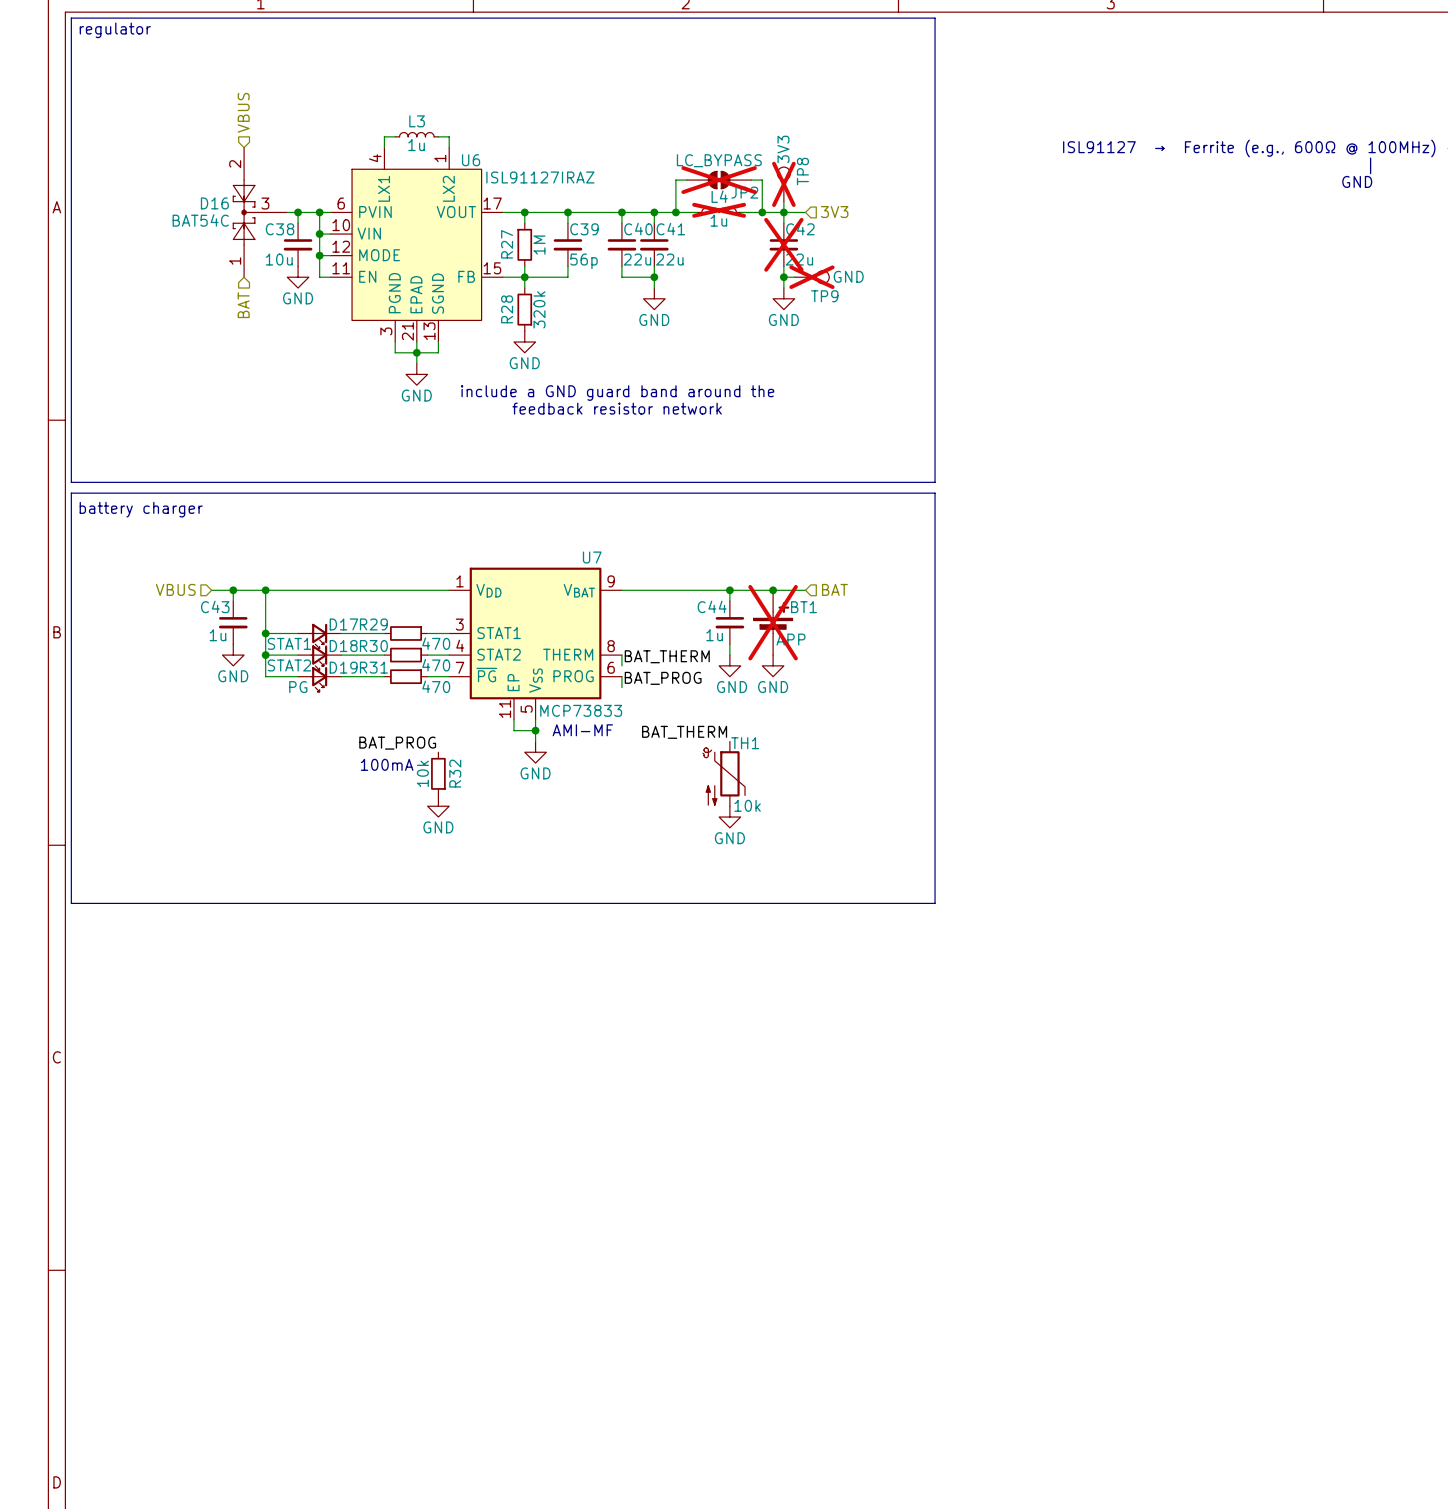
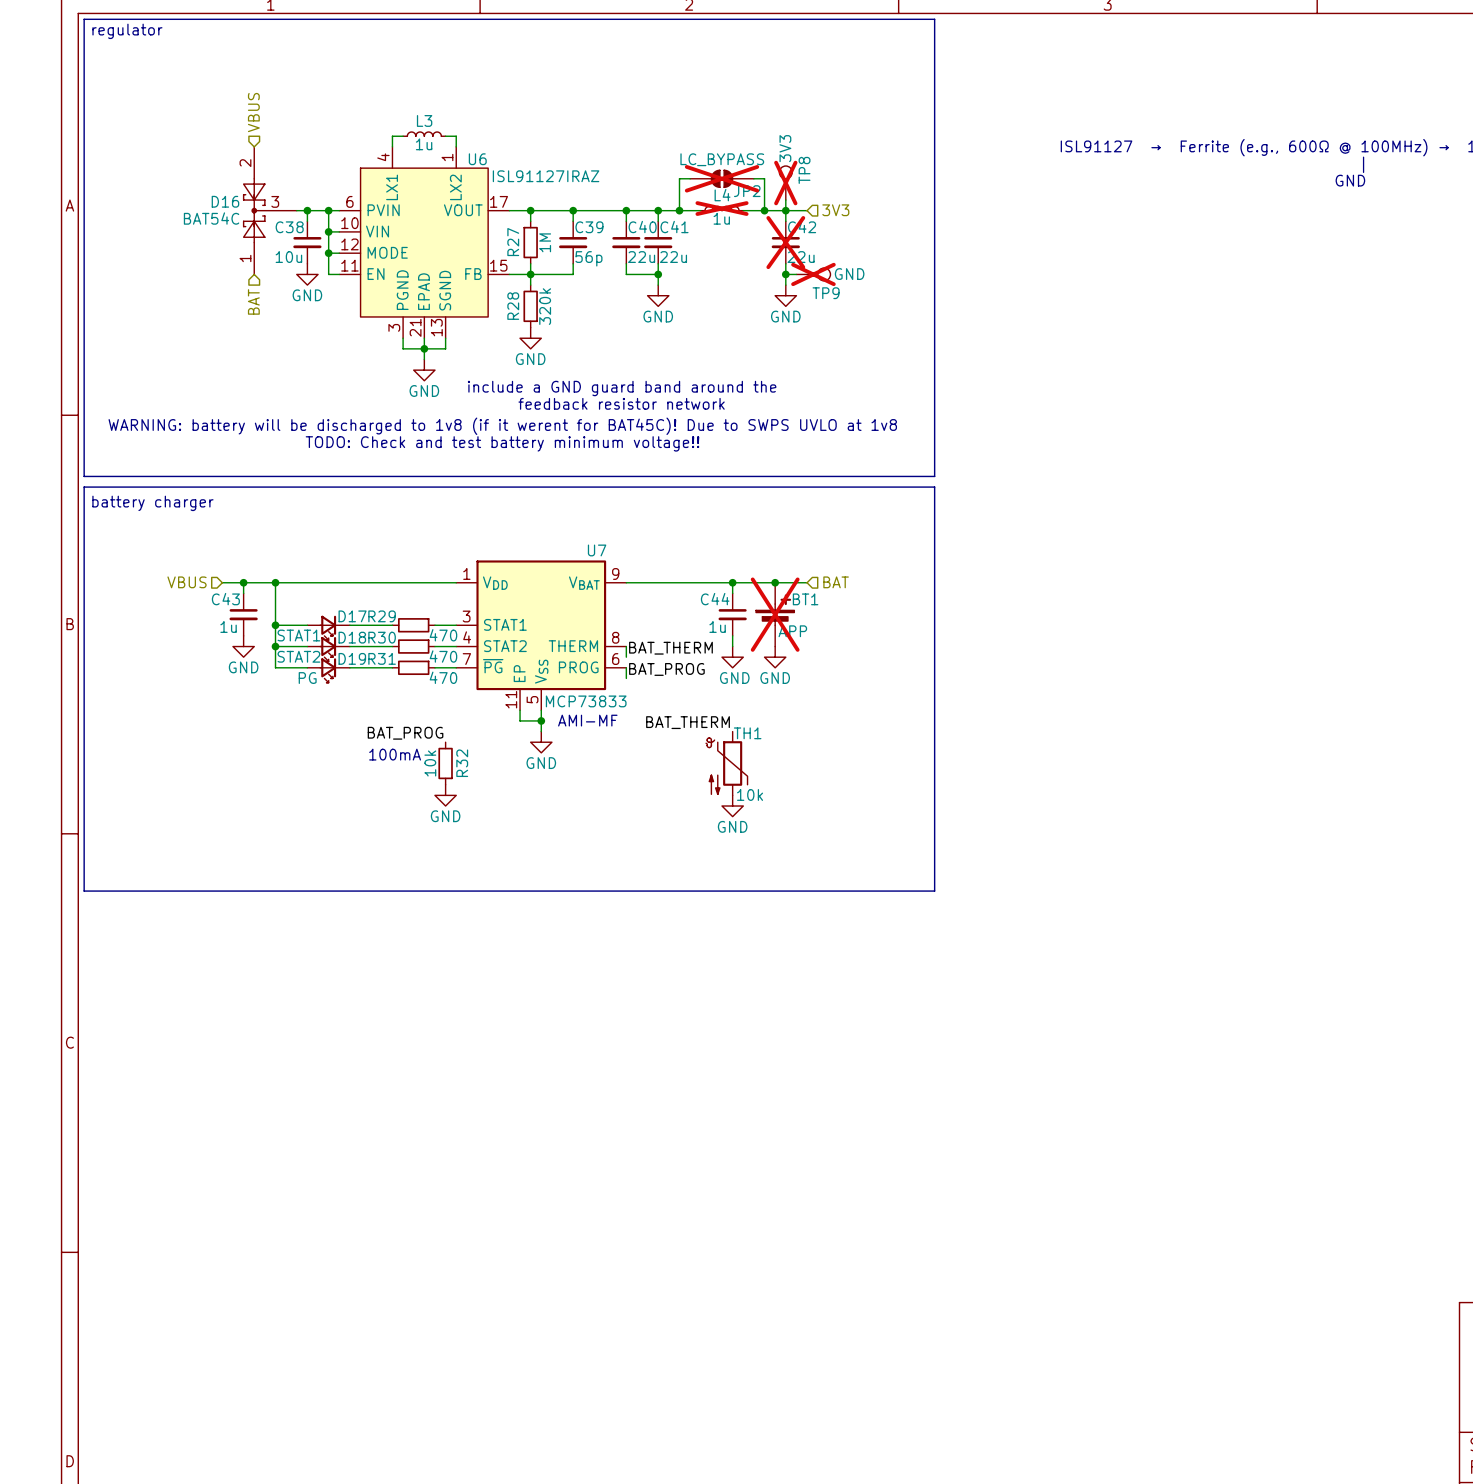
text: none -> WARNING: battery will be discharged to 1v8 (if it werent for BAT45C)! Due to SWPS UVLO at 1v8 (502, 426)
text: none -> TODO: Check and test battery minimum voltage!! (502, 443)

